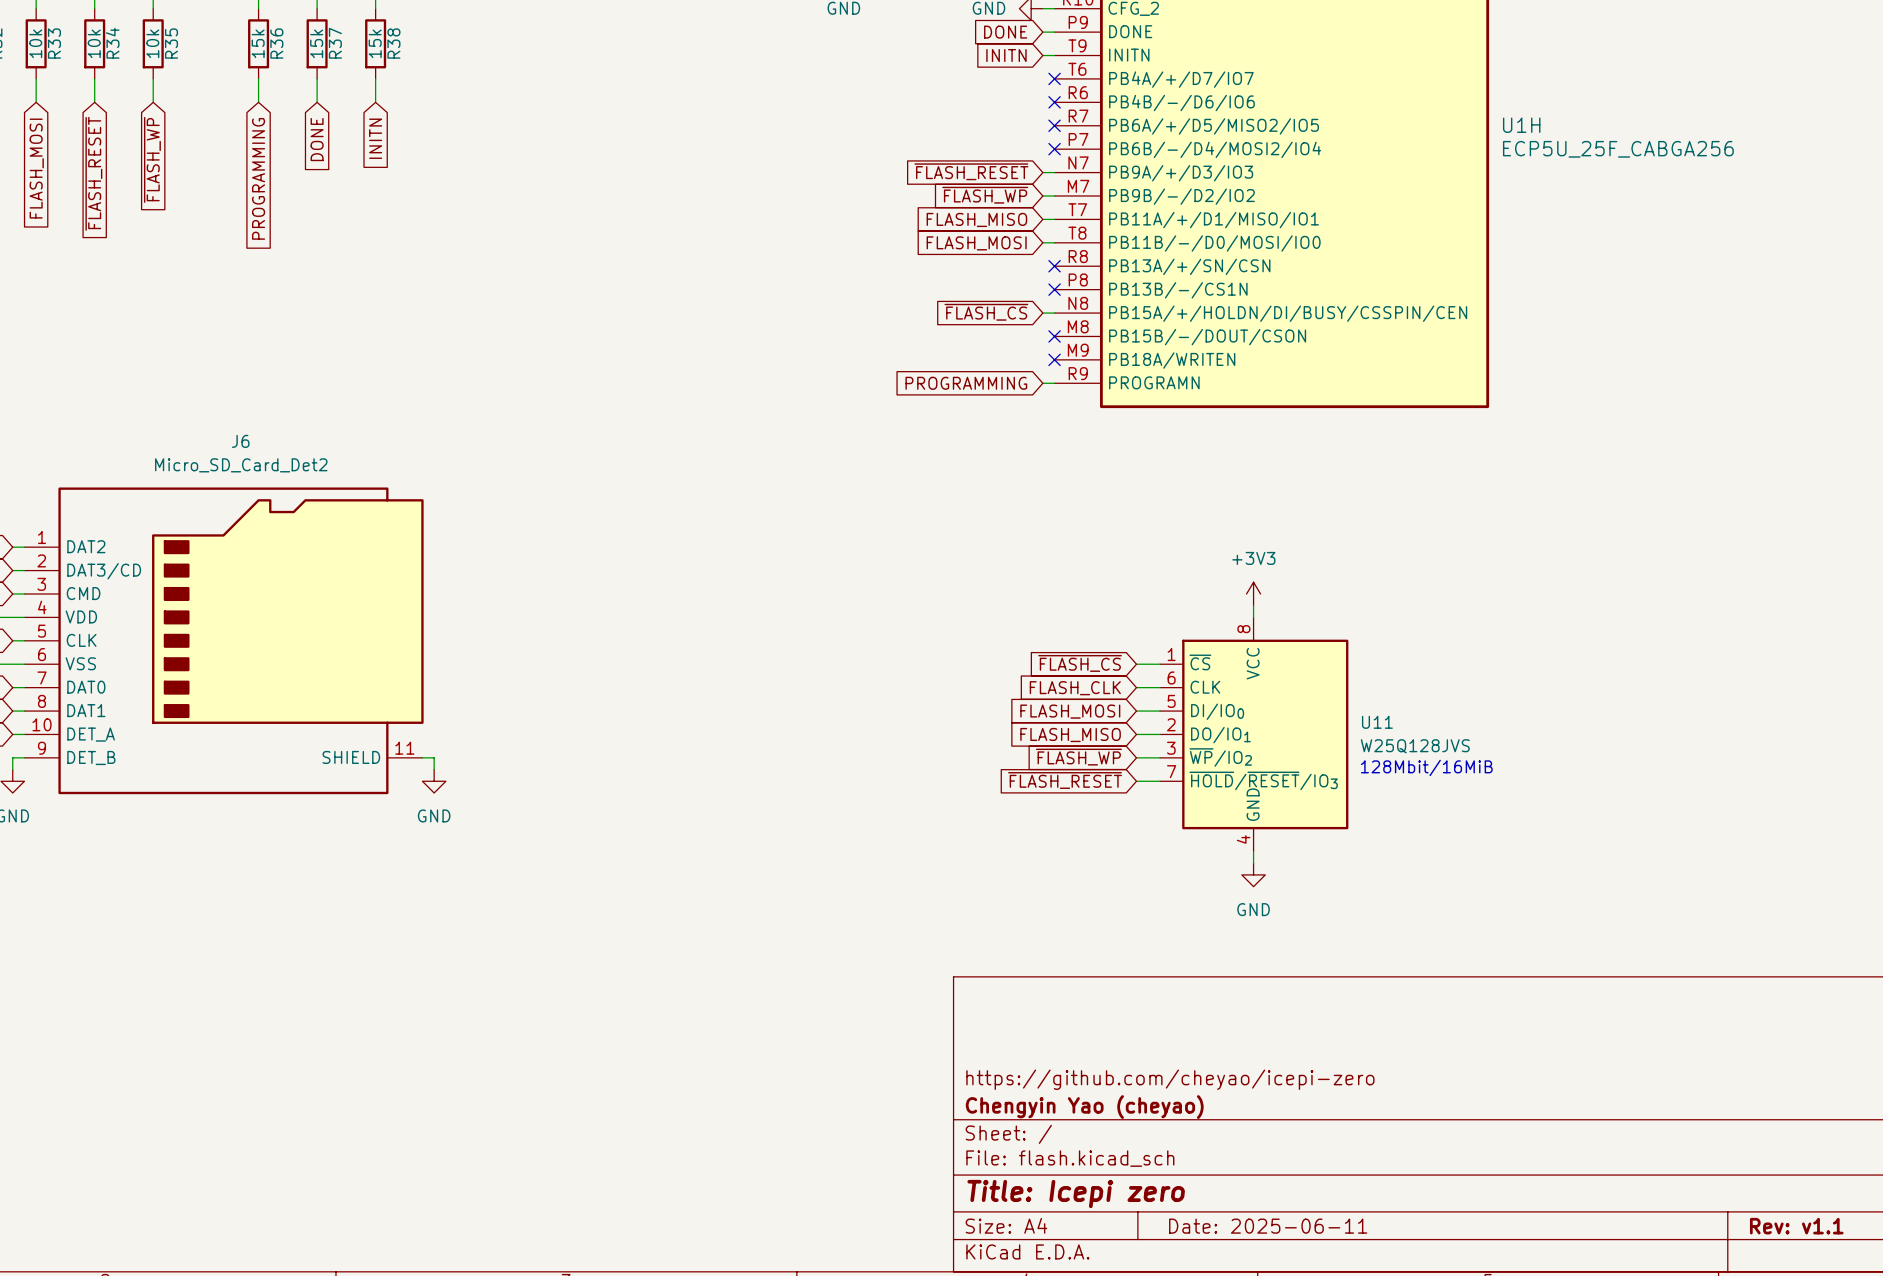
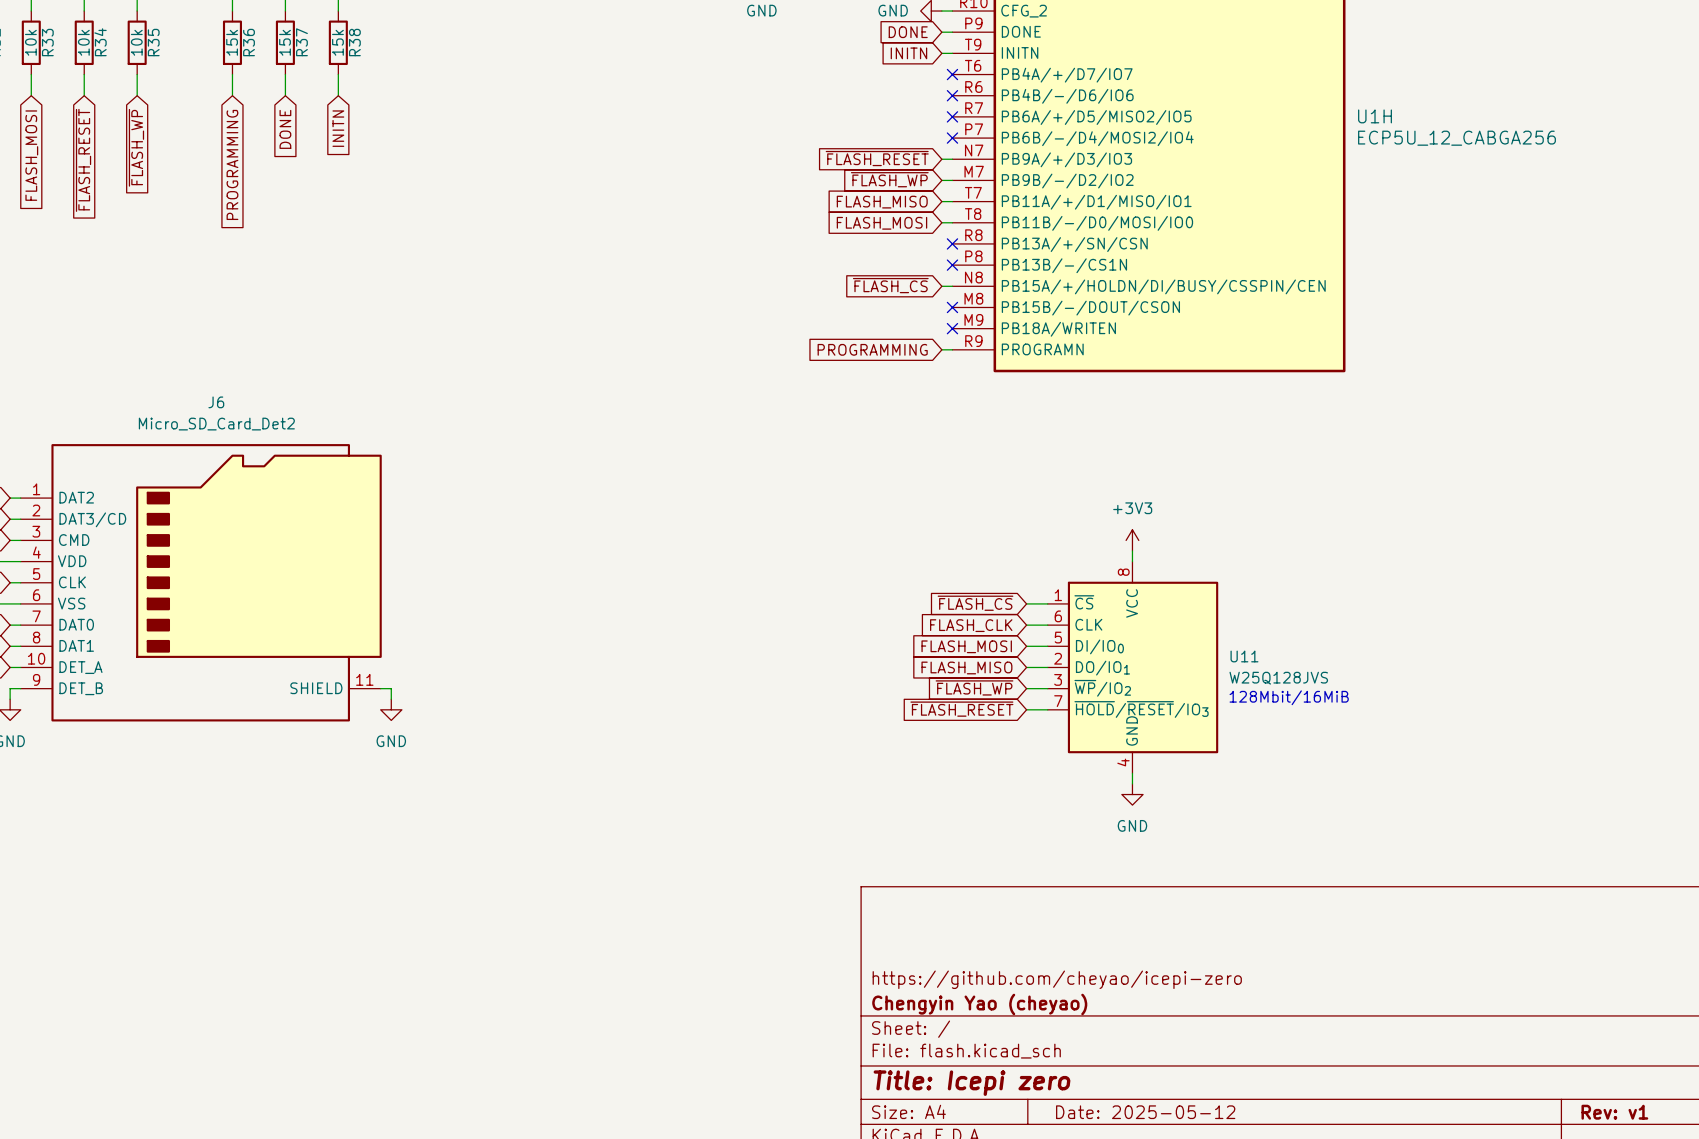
U1H value: ECP5U_25F_CABGA256 (1618, 149) -> ECP5U_12_CABGA256 (1456, 138)
title block: Date: 2025-06-11 (1268, 1226) -> Date: 2025-05-12 (1145, 1112)
title block: Rev: v1.1 (1796, 1226) -> Rev: v1 (1614, 1112)

